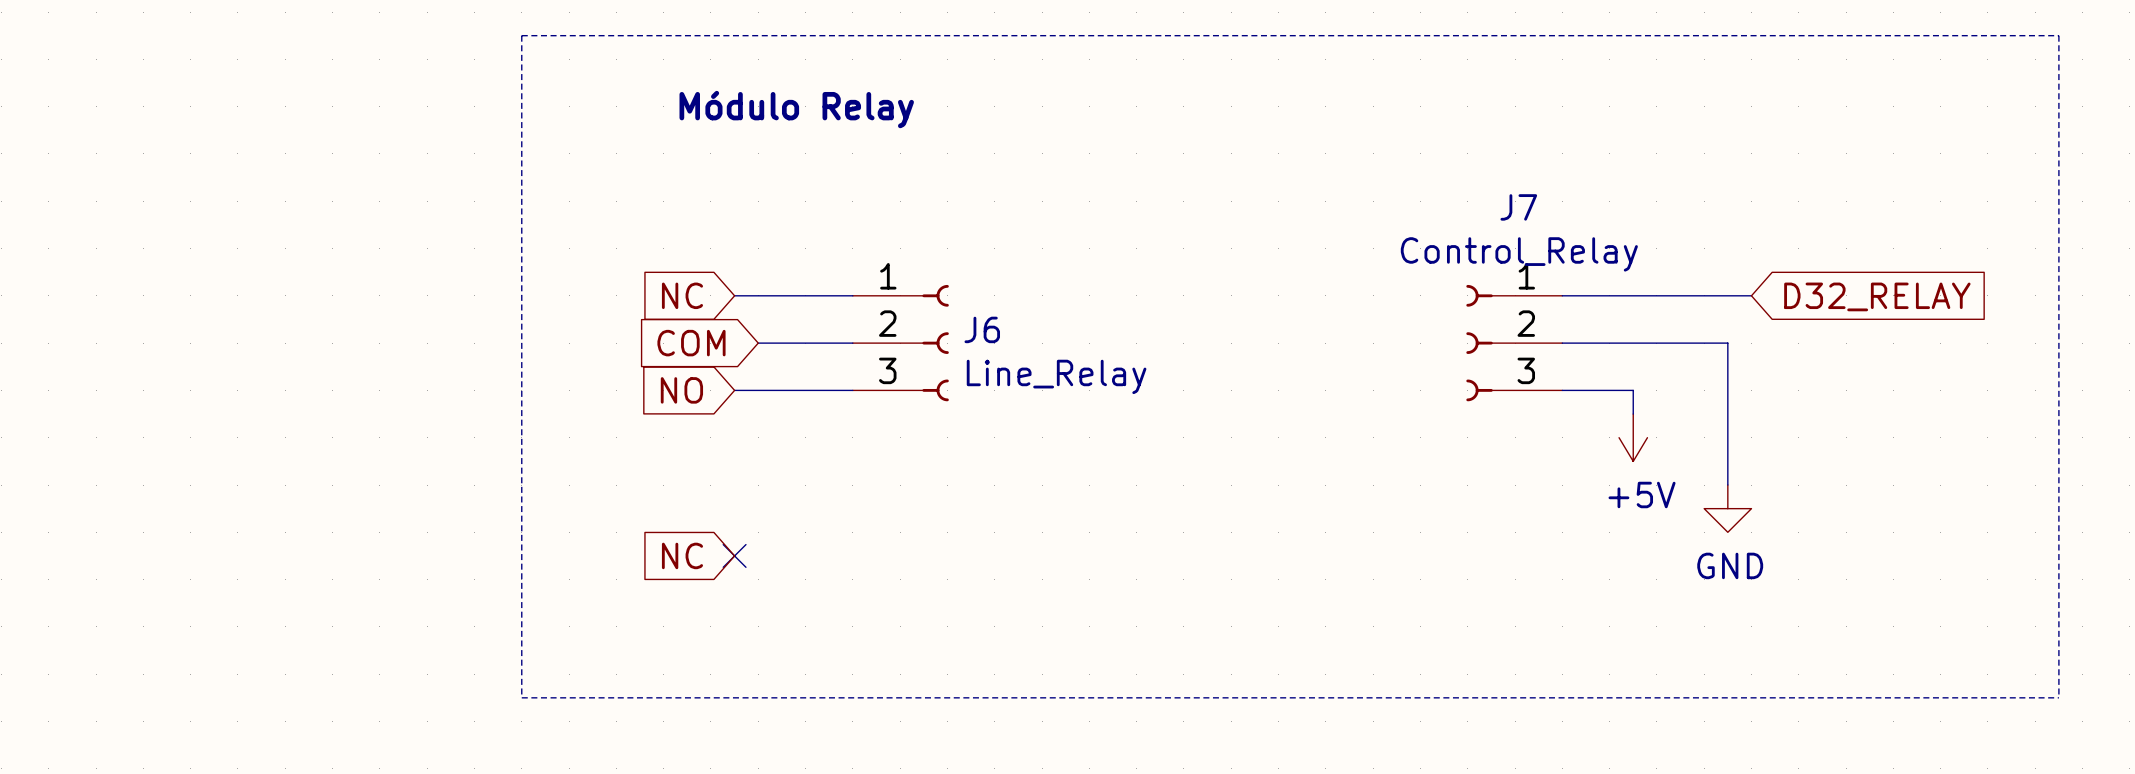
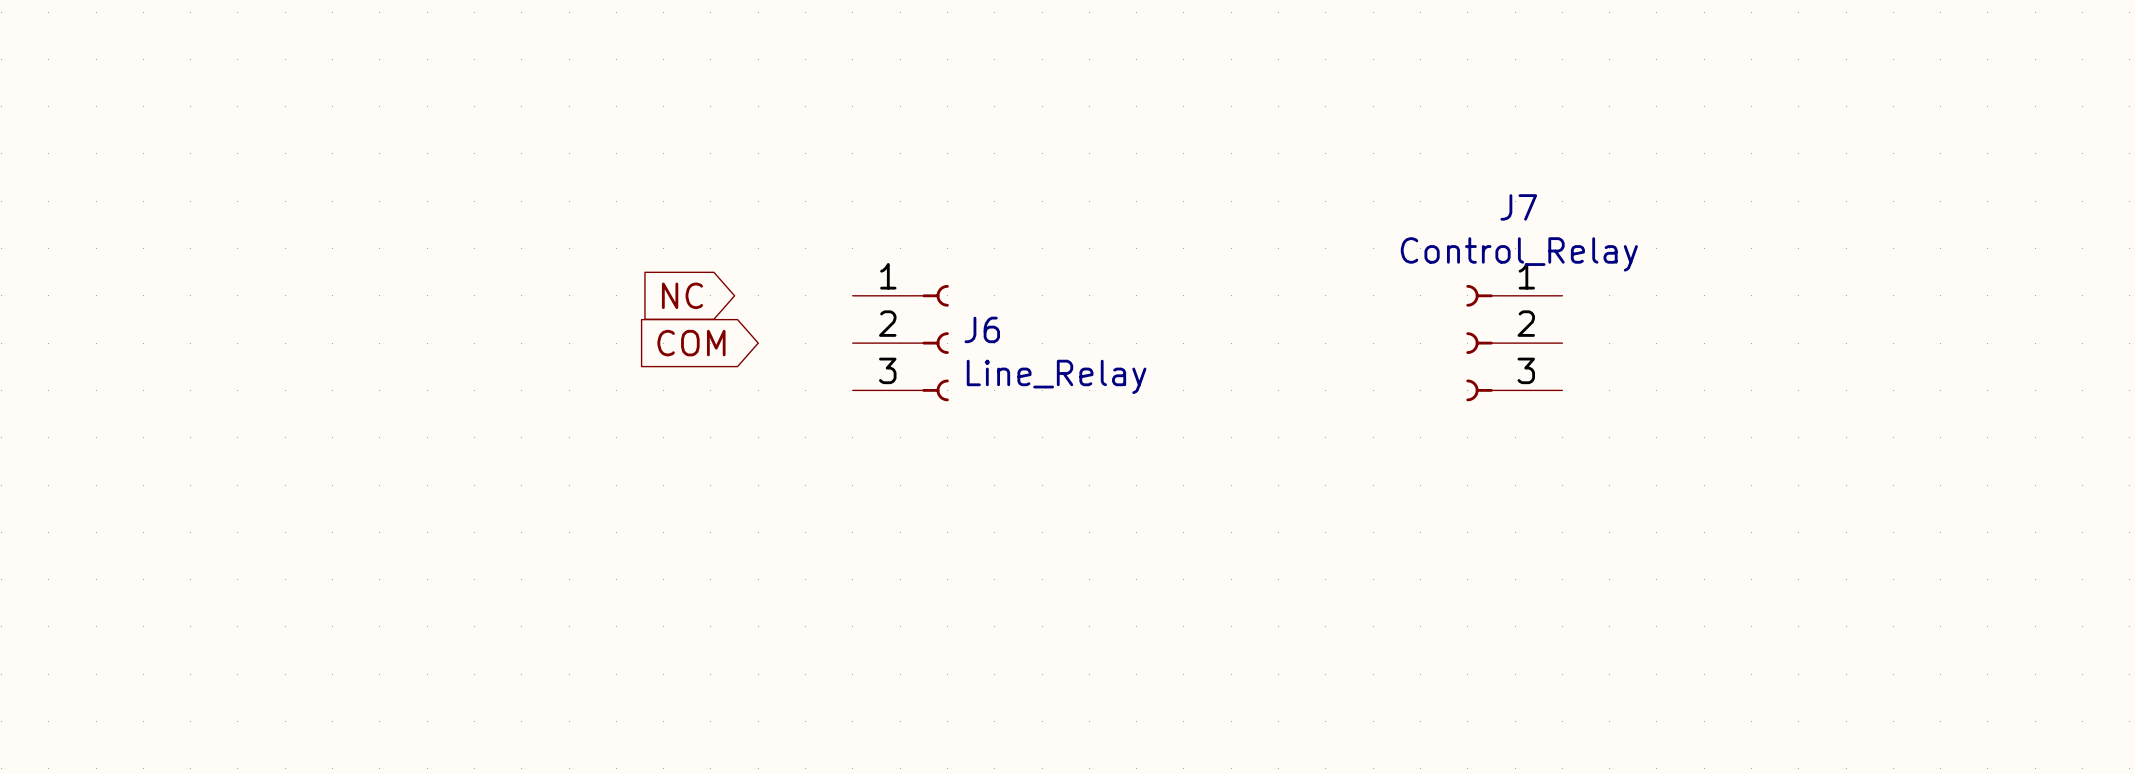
line: (521, 35) (2058, 35) (2058, 697) (521, 697) (521, 35) -> none
text: Módulo Relay (796, 109) -> none
wire: (734, 295) (852, 295) -> none
wire: (1562, 295) (1751, 295) -> none
global label: D32_RELAY (1877, 296) -> none
wire: (758, 343) (852, 343) -> none
wire: (1562, 343) (1727, 343) (1727, 485) -> none
global label: NO (681, 390) -> none
wire: (734, 390) (852, 390) -> none
wire: (1562, 390) (1633, 390) (1633, 414) -> none
power symbol: +5V (1633, 437) -> none
power symbol: GND (1727, 508) -> none
global label: NC (682, 555) -> none
no-connect mark: (734, 555) -> none

